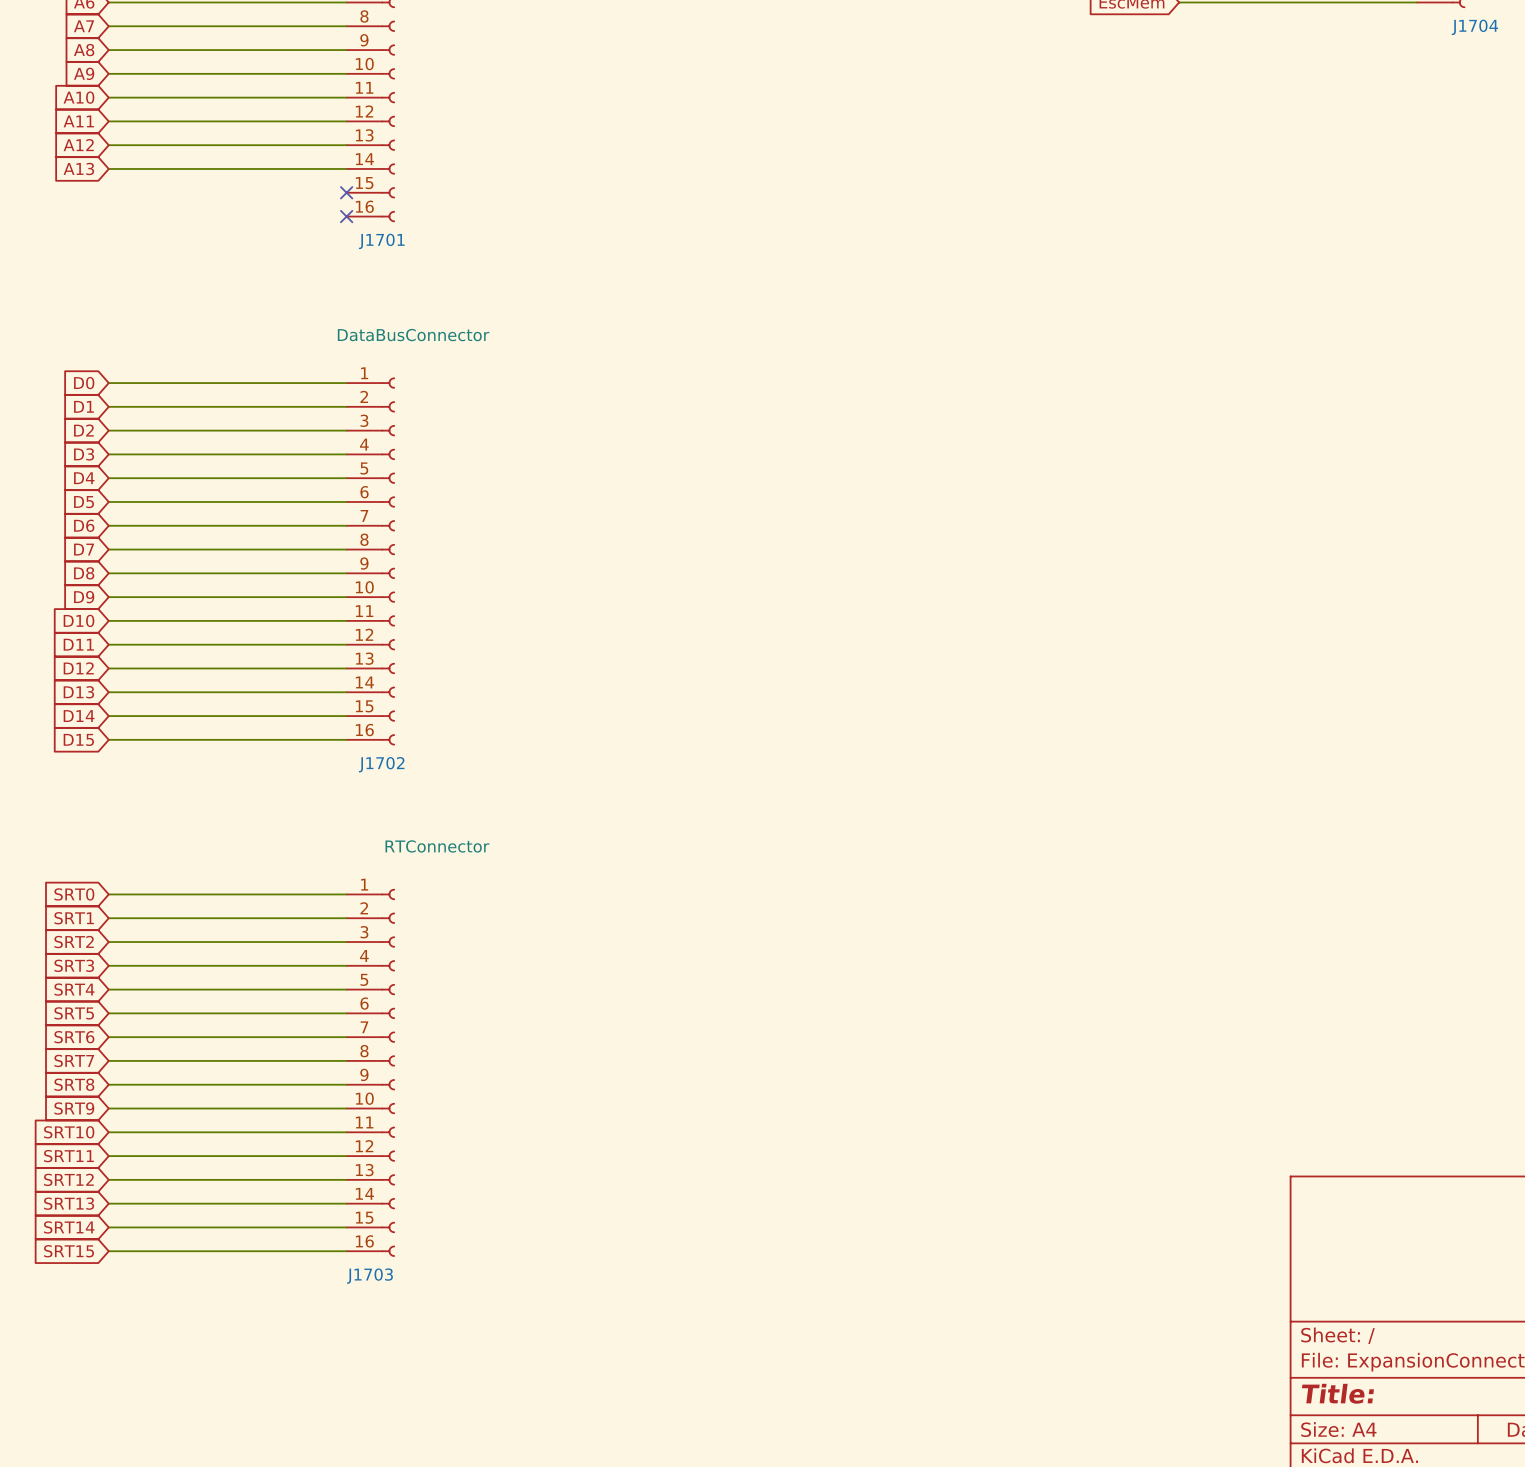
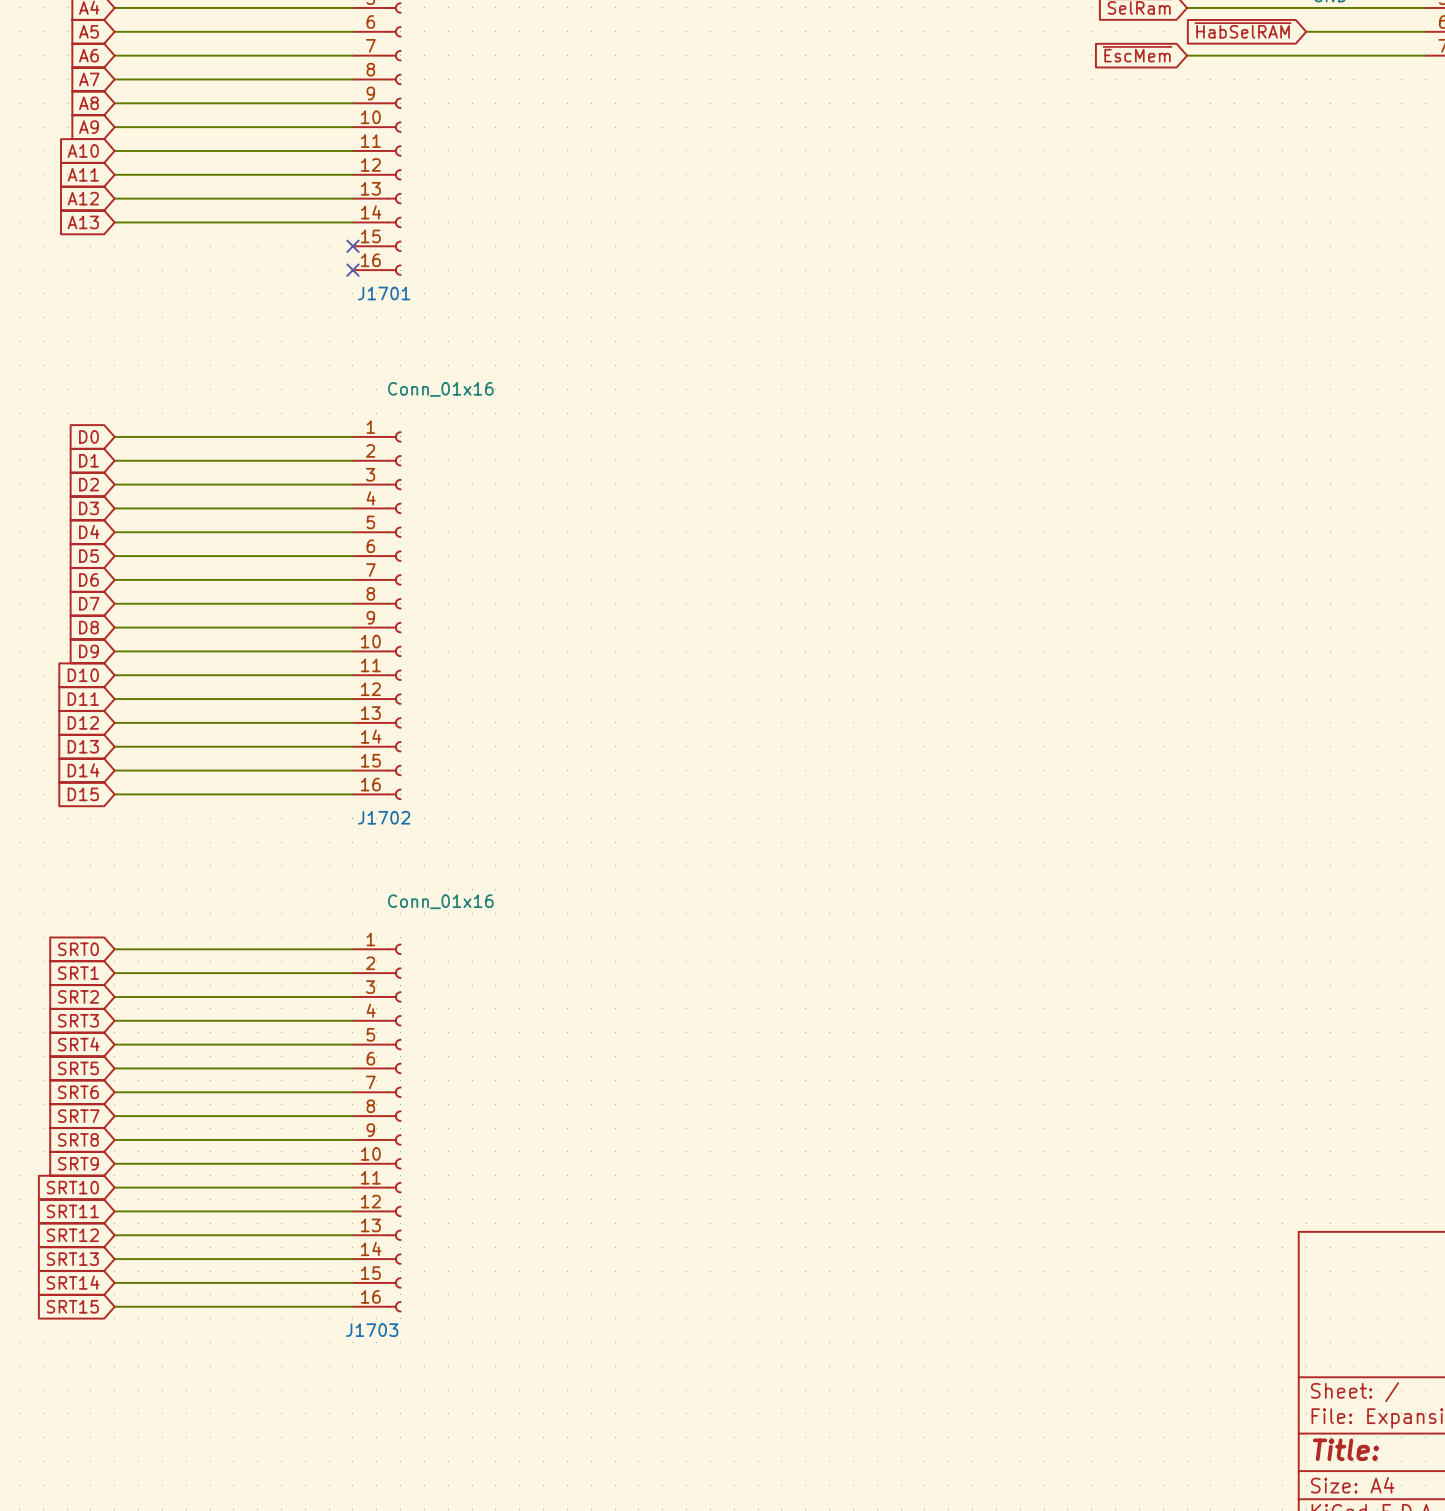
J1702 value: DataBusConnector (413, 335) -> Conn_01x16 (440, 389)
J1703 value: RTConnector (437, 846) -> Conn_01x16 (440, 901)

